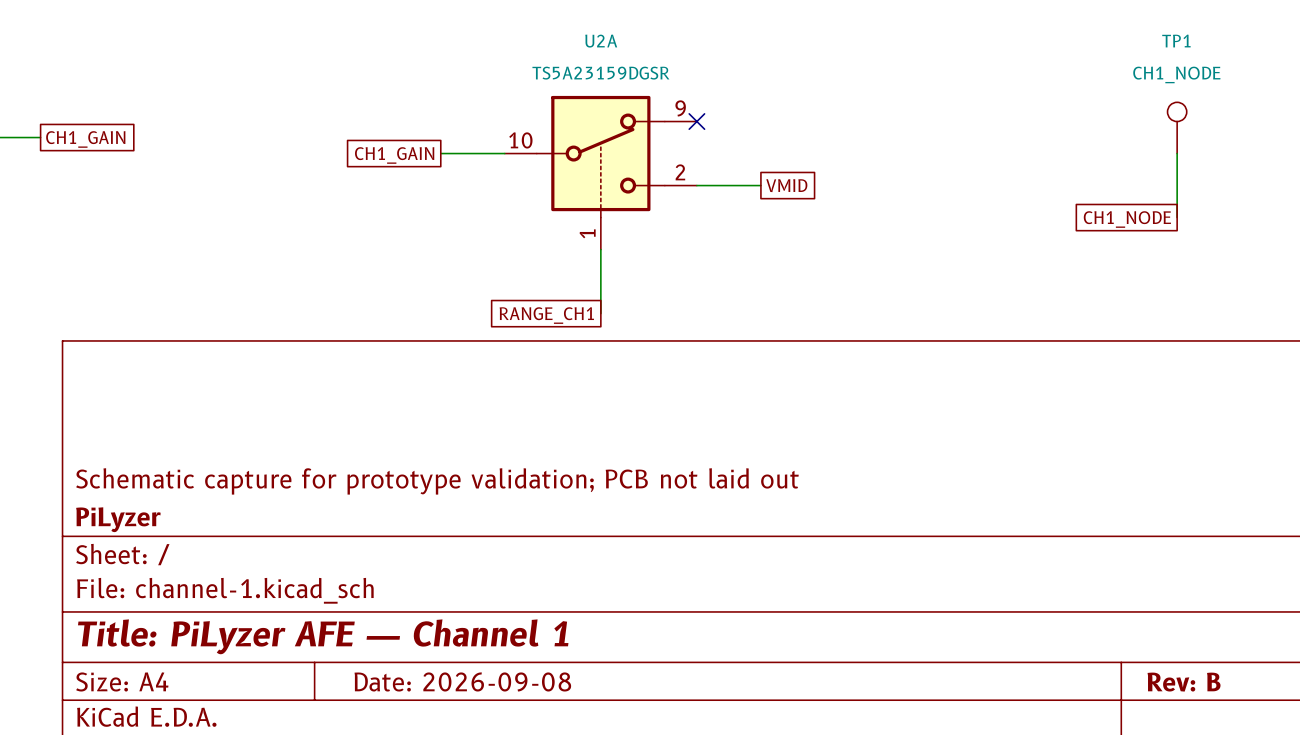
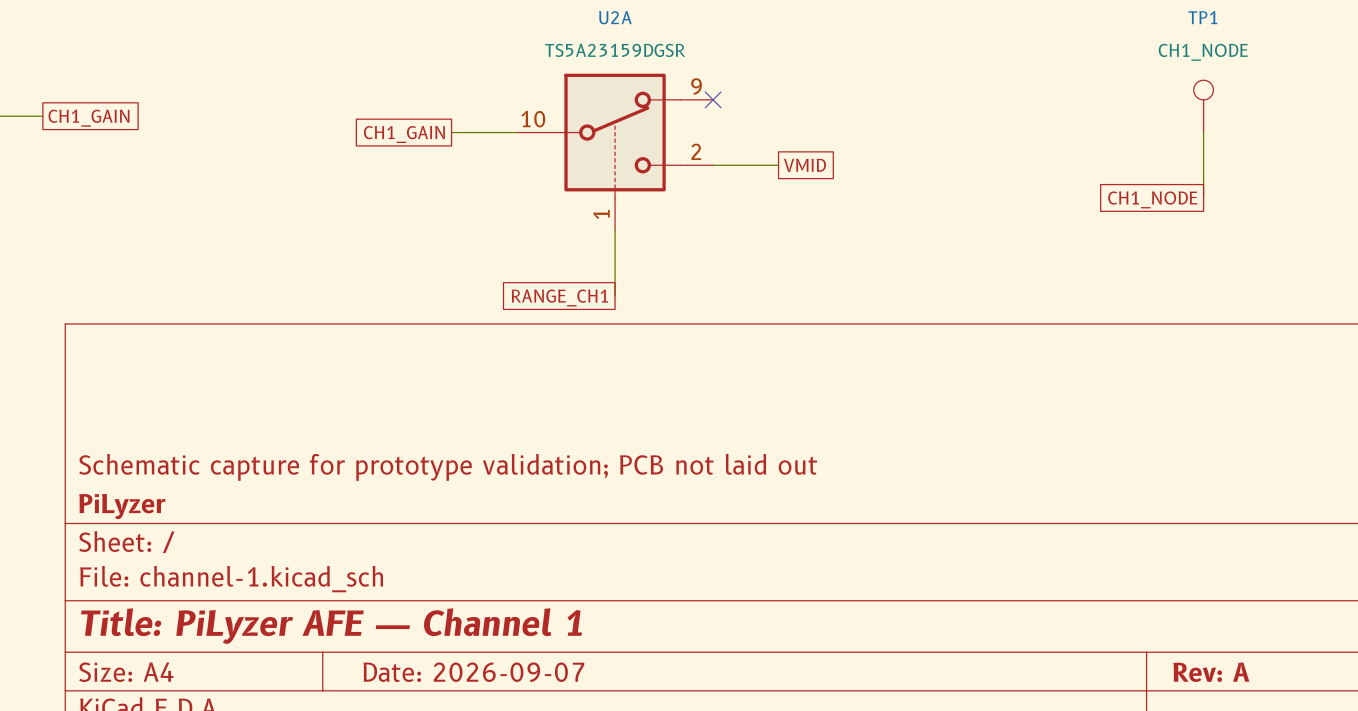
title block: Date: 2026-09-08 (462, 681) -> Date: 2026-09-07 (473, 672)
title block: Rev: B (1184, 682) -> Rev: A (1211, 672)

